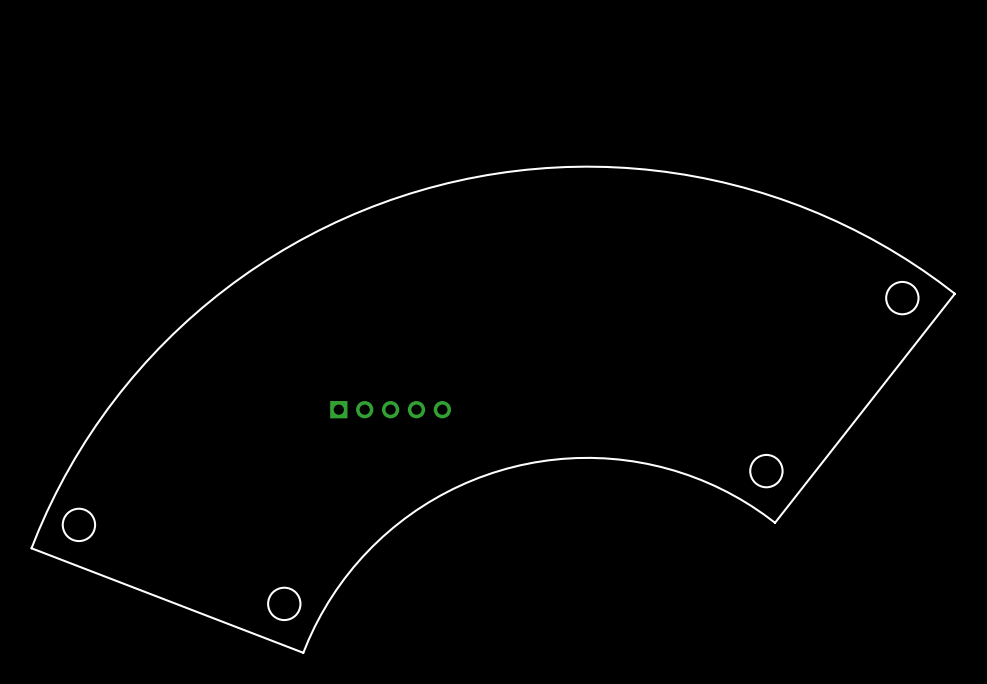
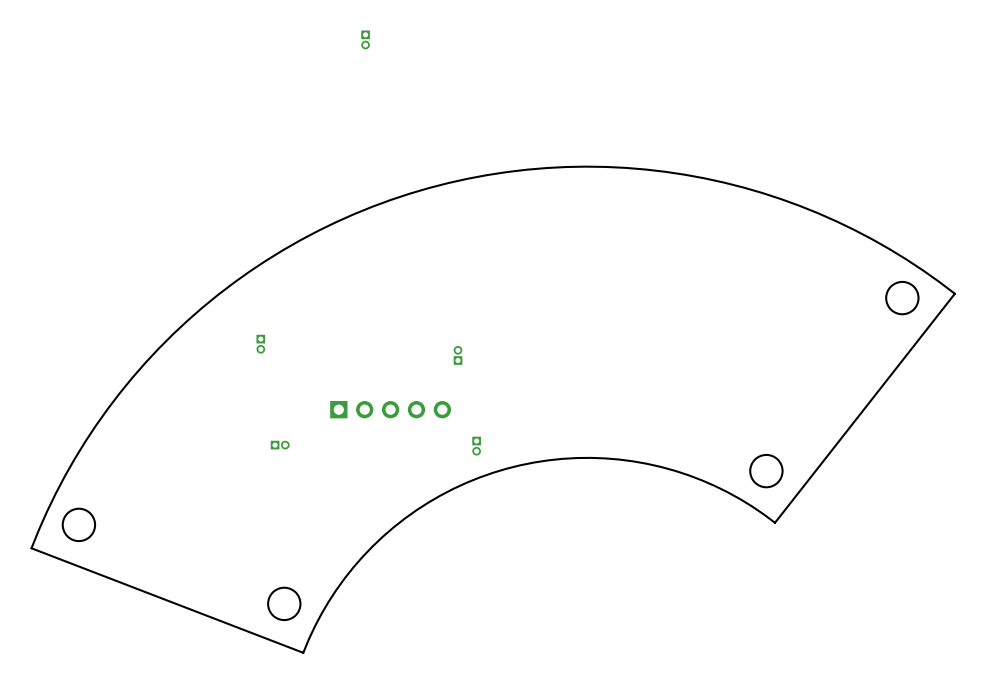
part: none -> (365, 39)
part: none -> (260, 344)
part: none -> (458, 355)
part: none -> (280, 445)
part: none -> (476, 446)

